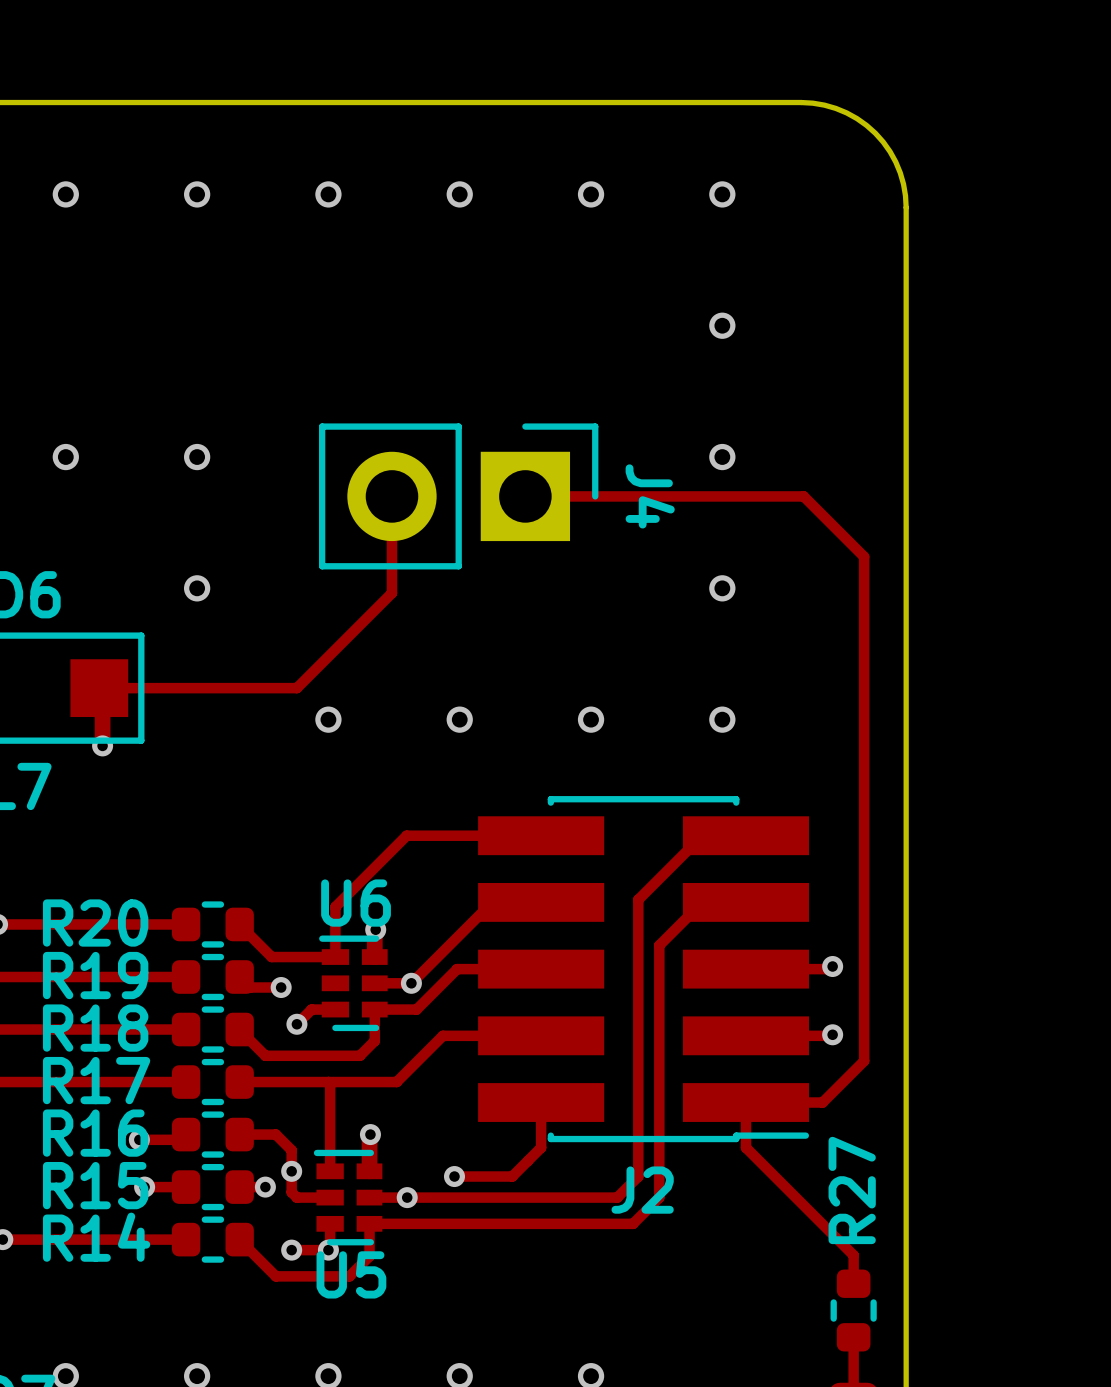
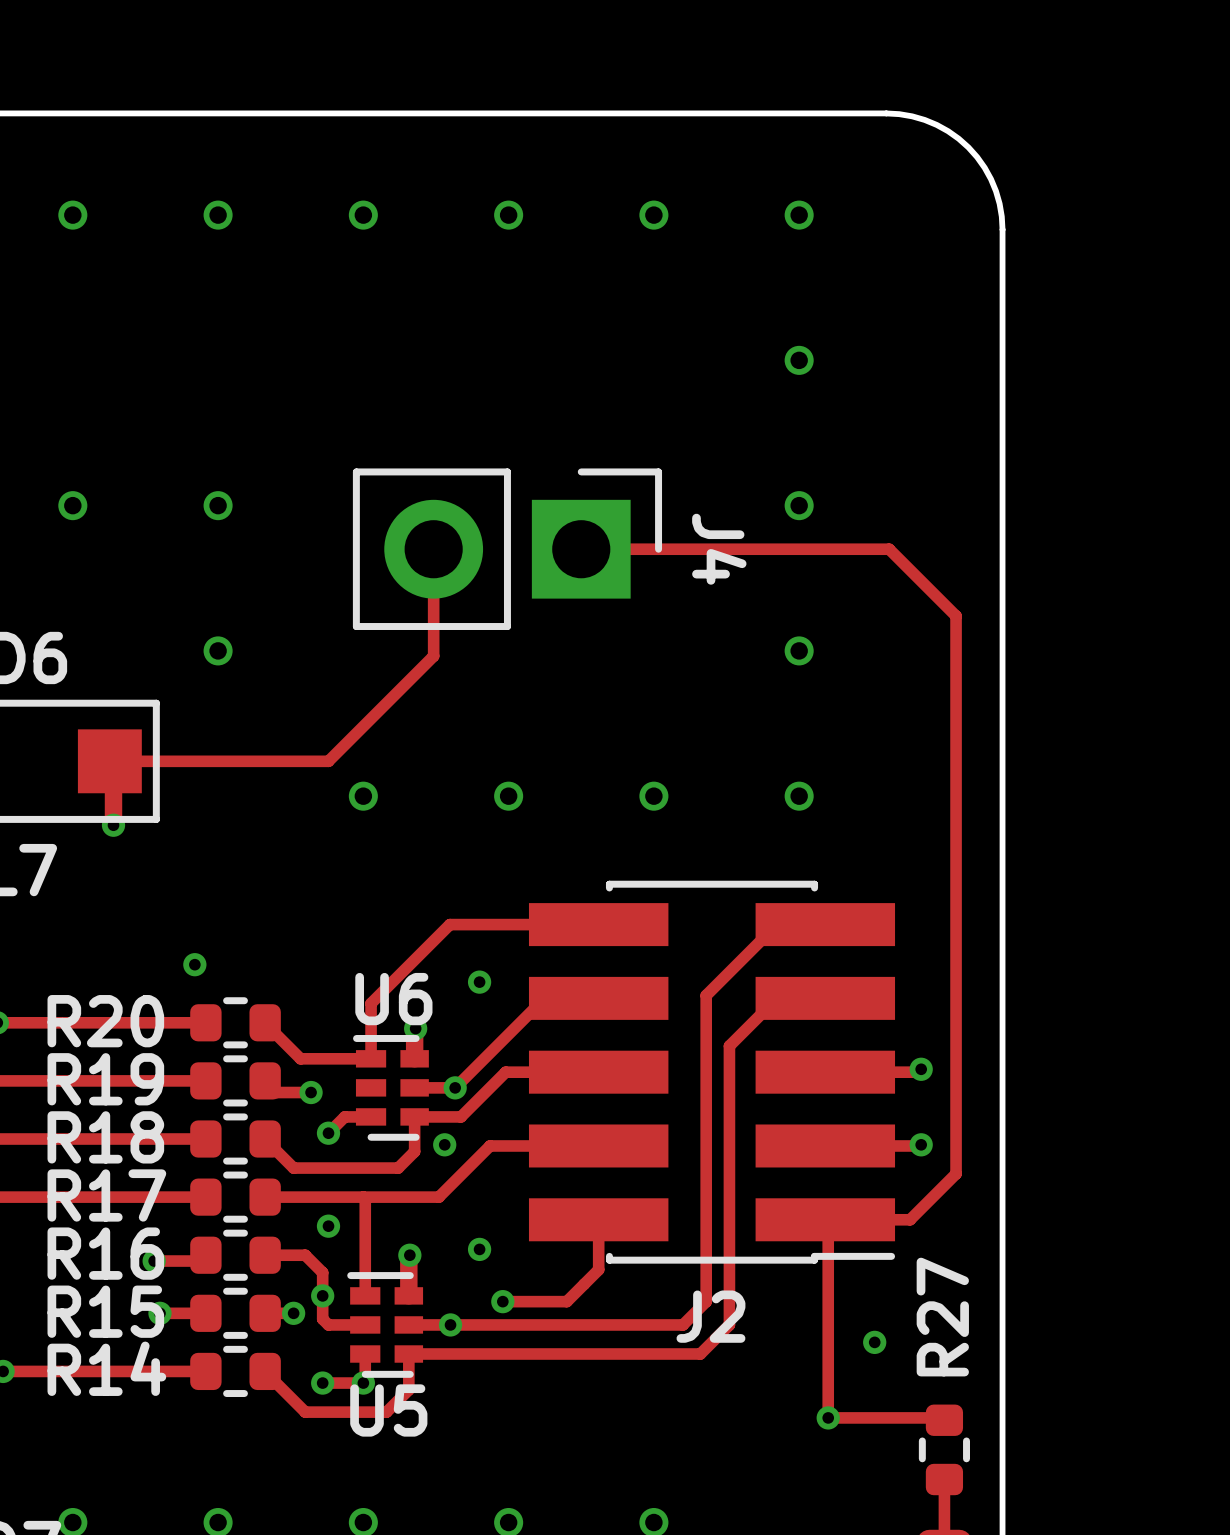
via: none -> (194, 964)
via: none -> (479, 982)
via: none -> (444, 1144)
track: (745, 1102) (745, 1147) (853, 1255) (853, 1283) -> (825, 1219) (828, 1222) (828, 1417) (942, 1417) (944, 1420)
via: none -> (328, 1226)
via: none -> (479, 1249)
via: none -> (874, 1342)
via: none -> (828, 1417)

